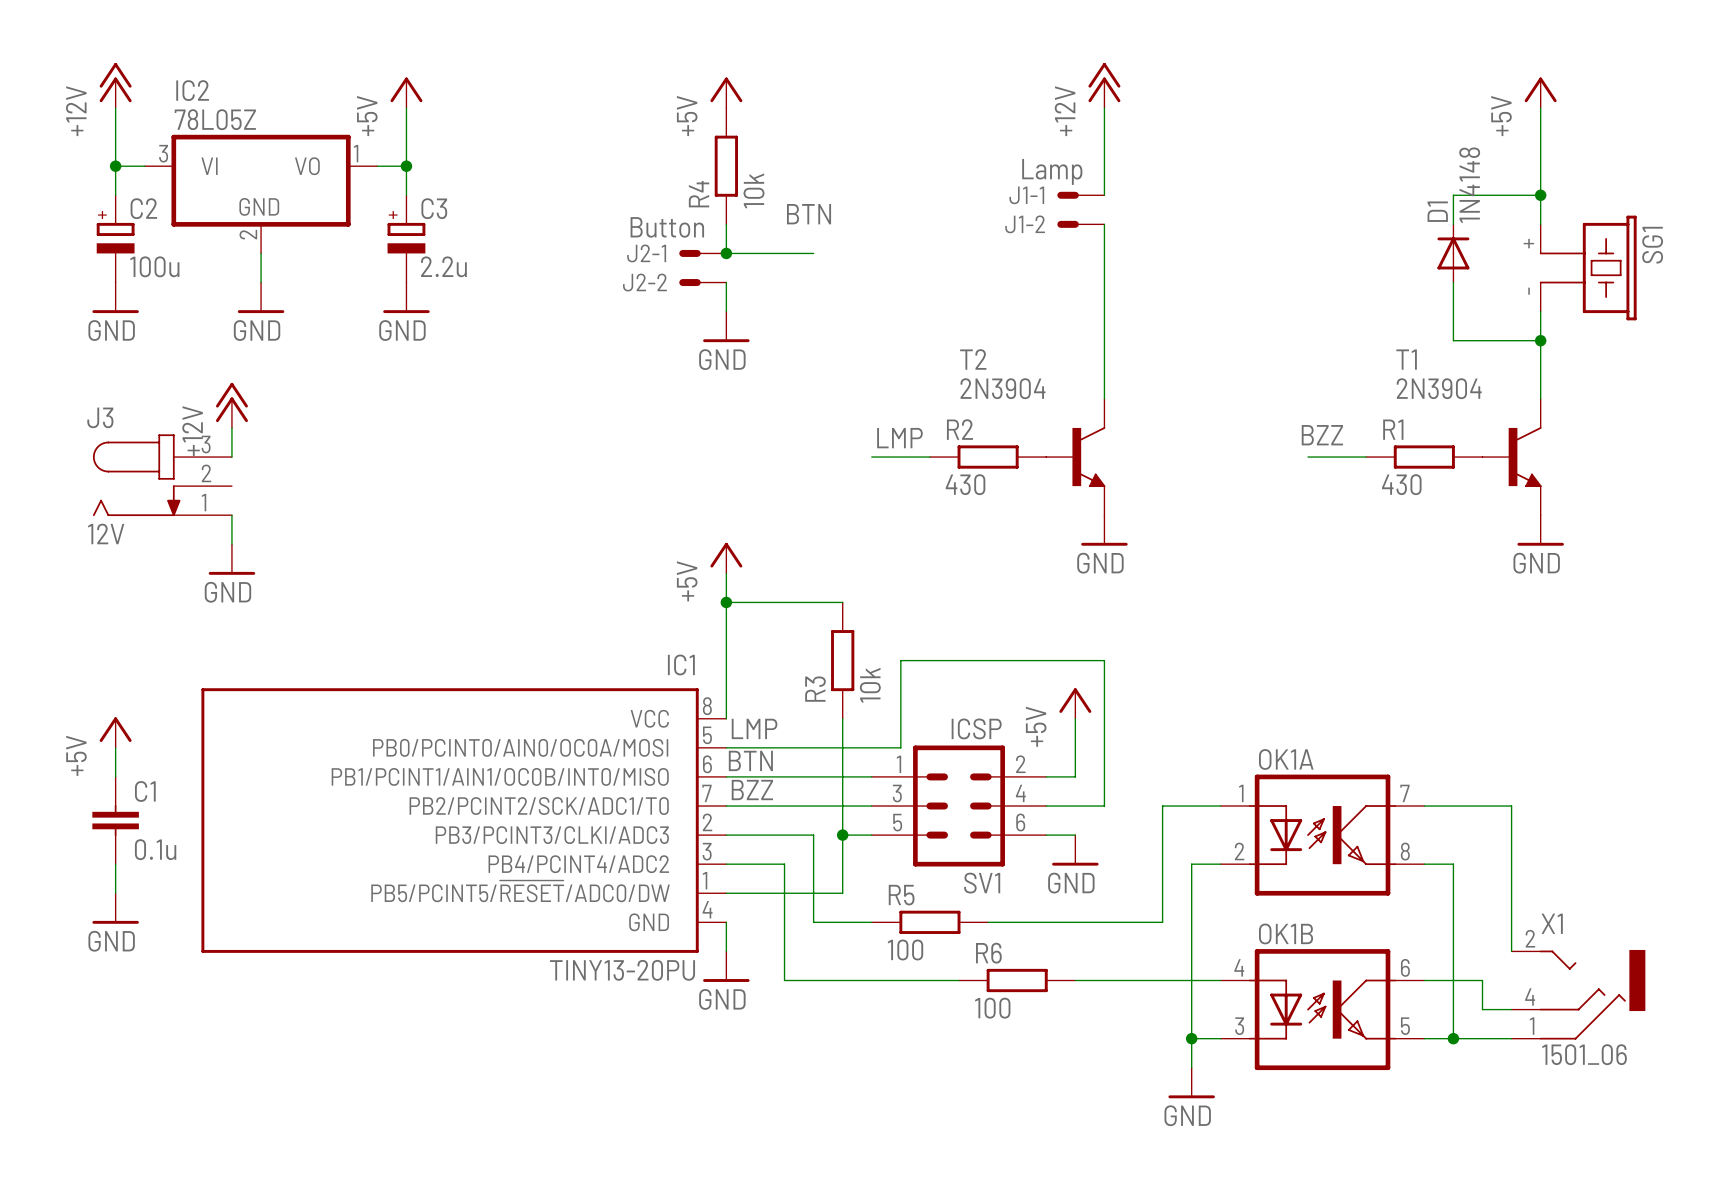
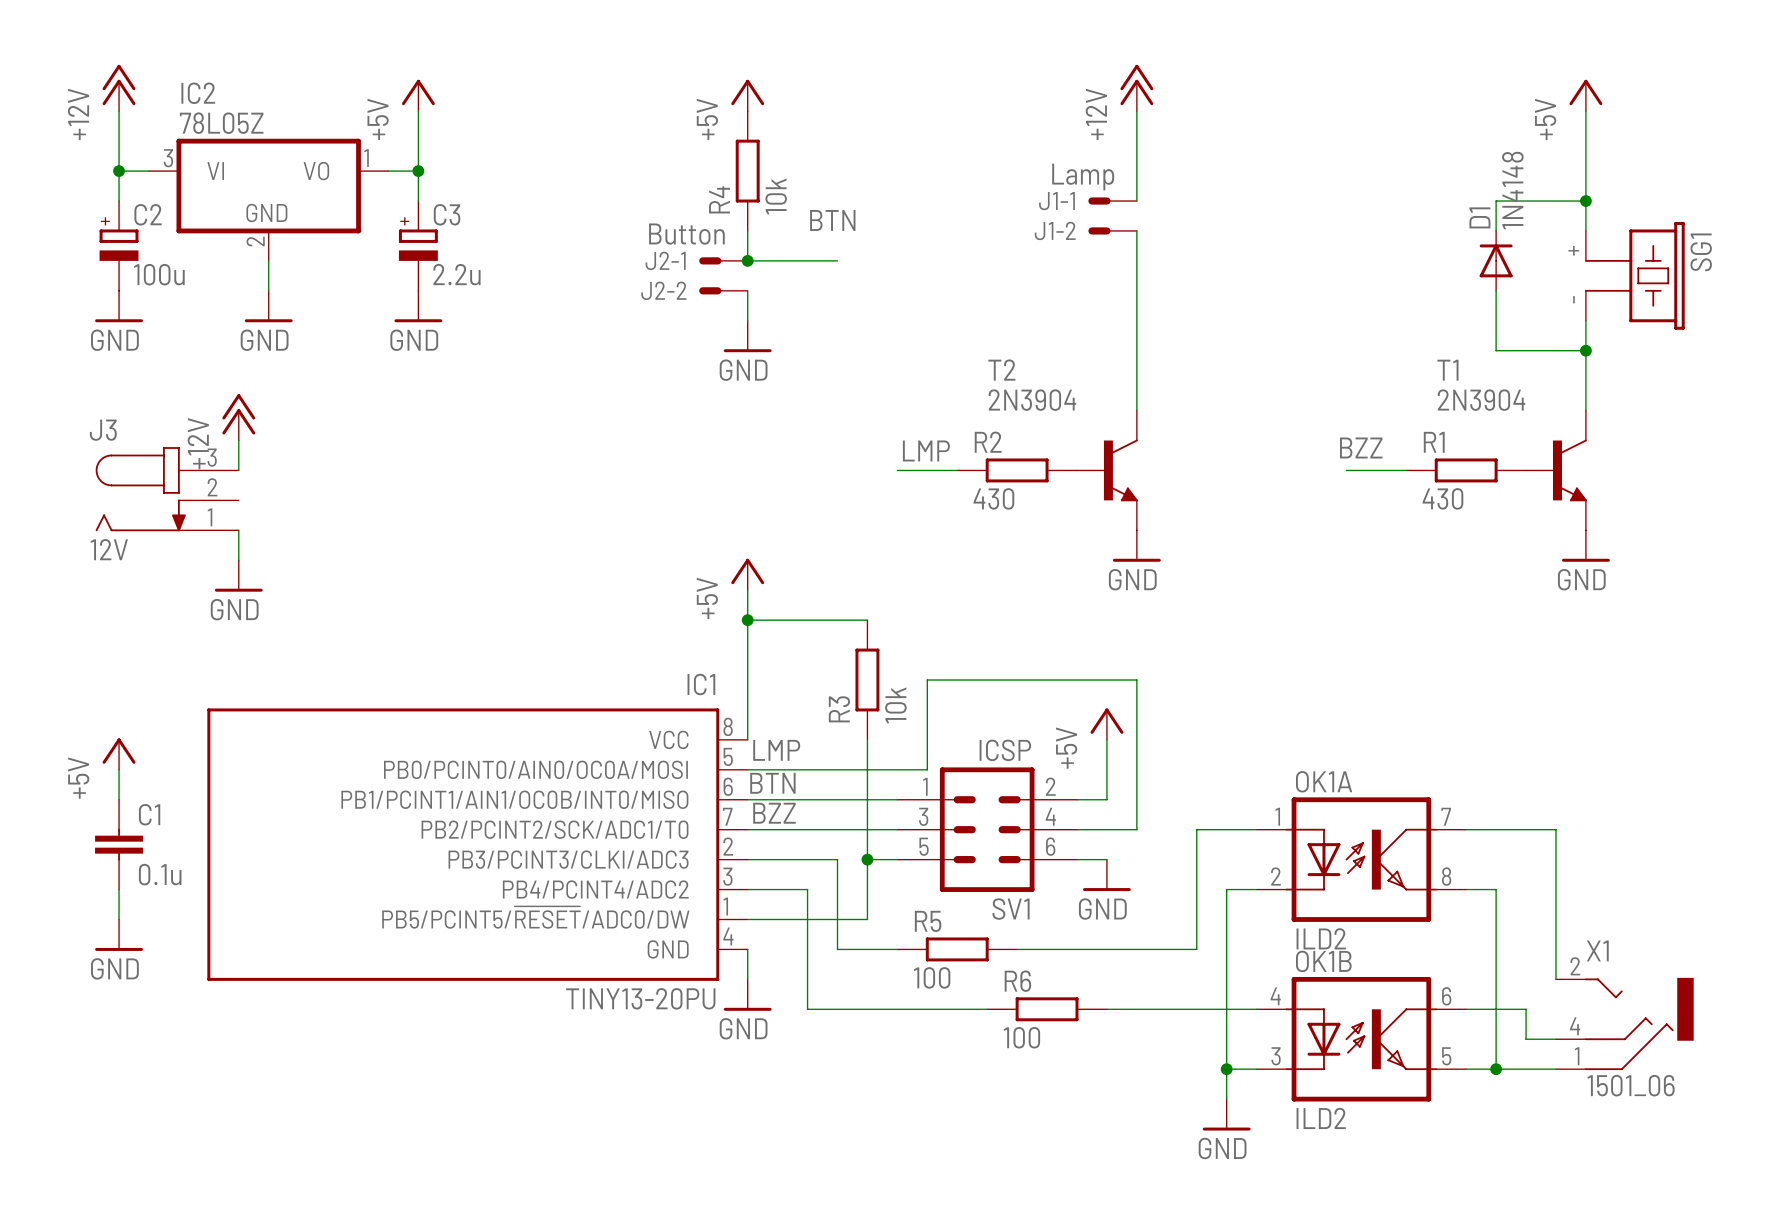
OK1A value: none -> ILD2 (1321, 938)
OK1B value: none -> ILD2 (1321, 1118)

